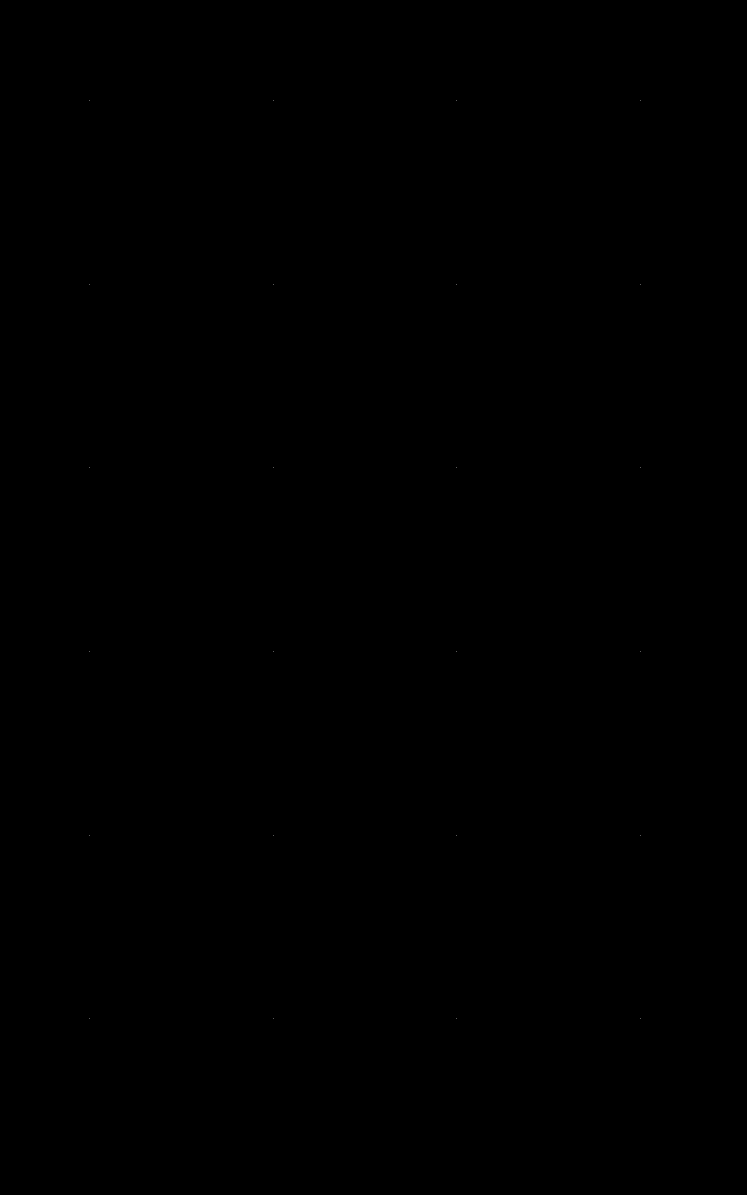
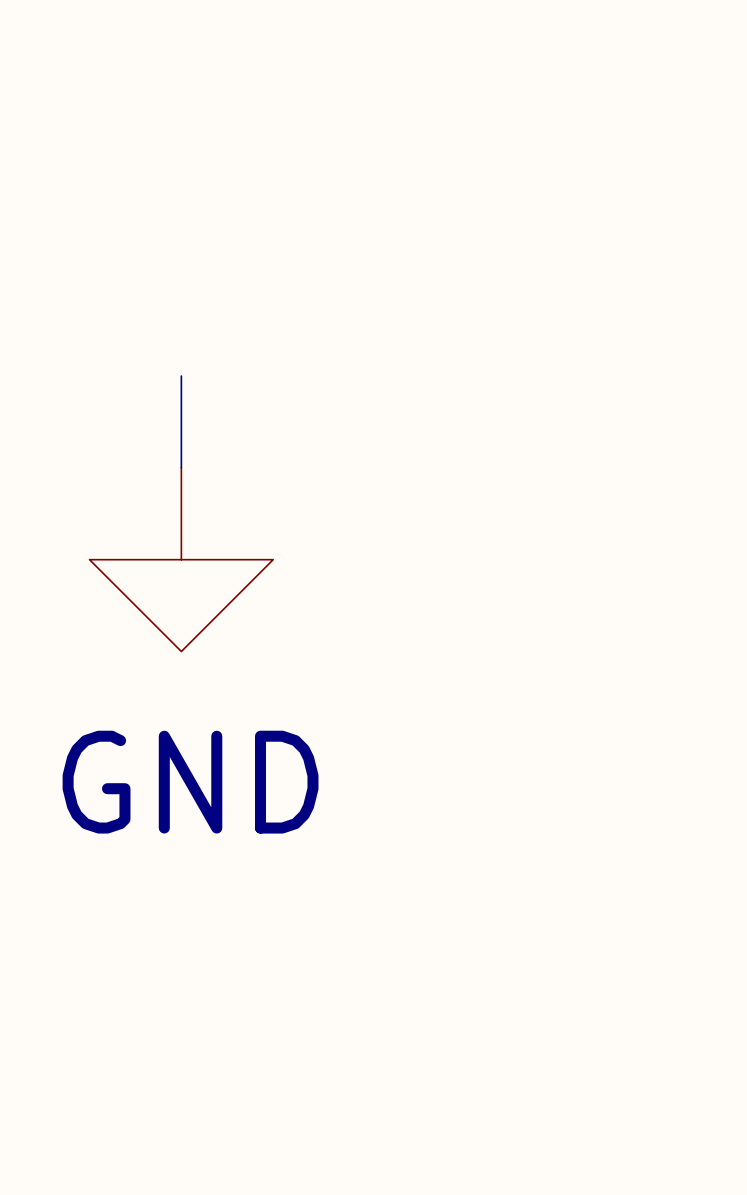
wire: none -> (181, 376) (181, 467)
power symbol: none -> GND (181, 559)

